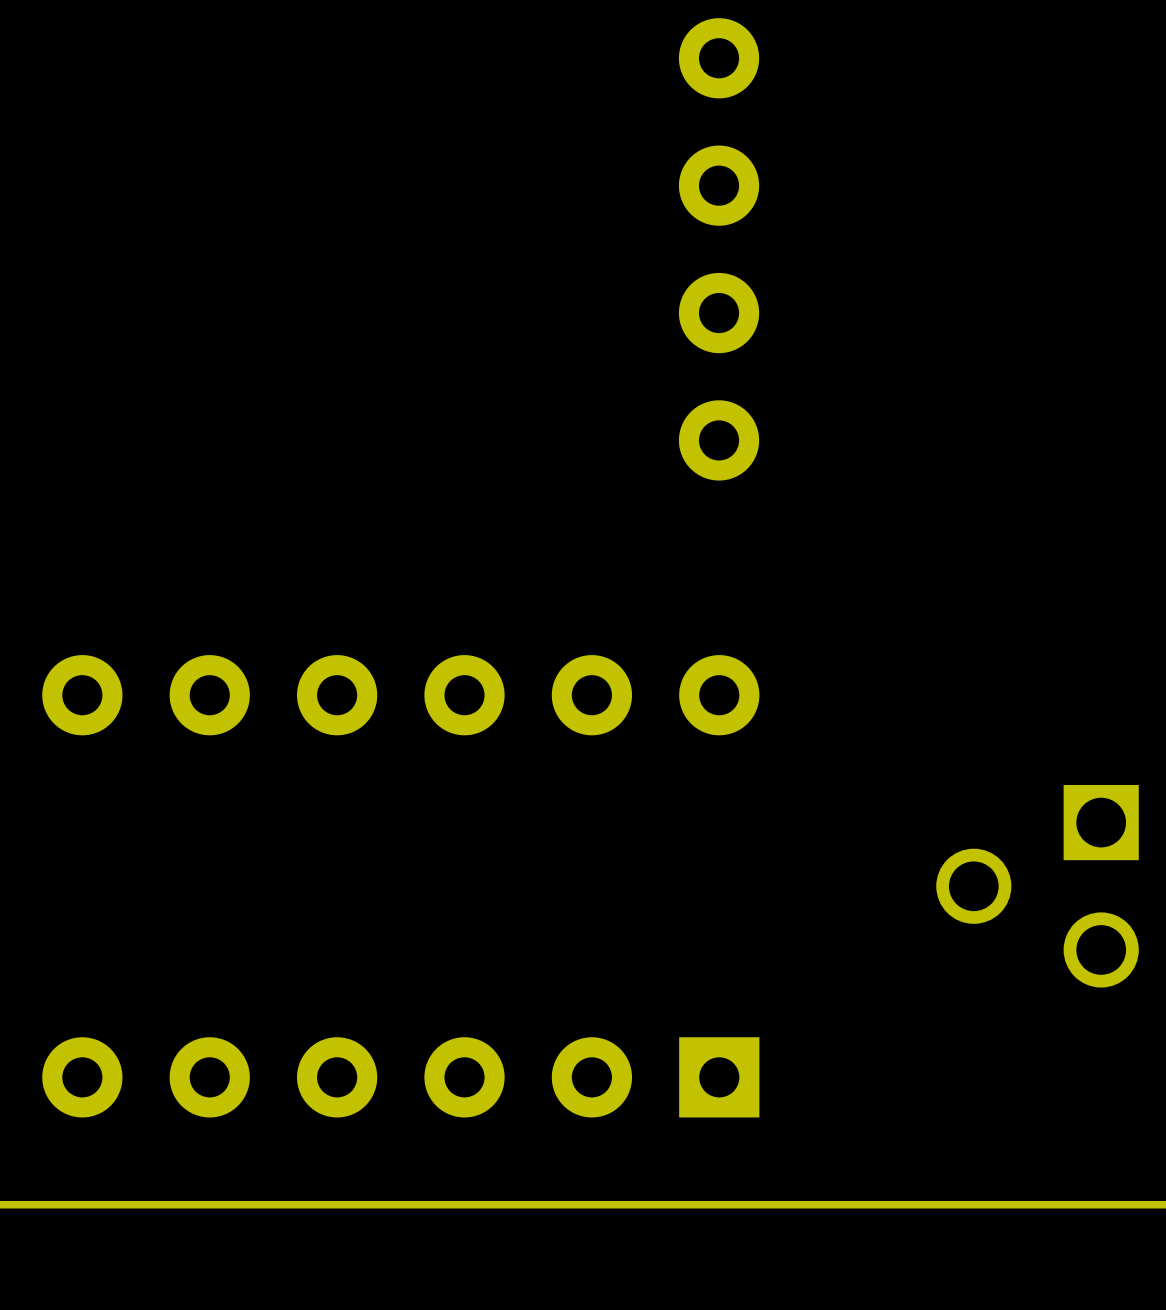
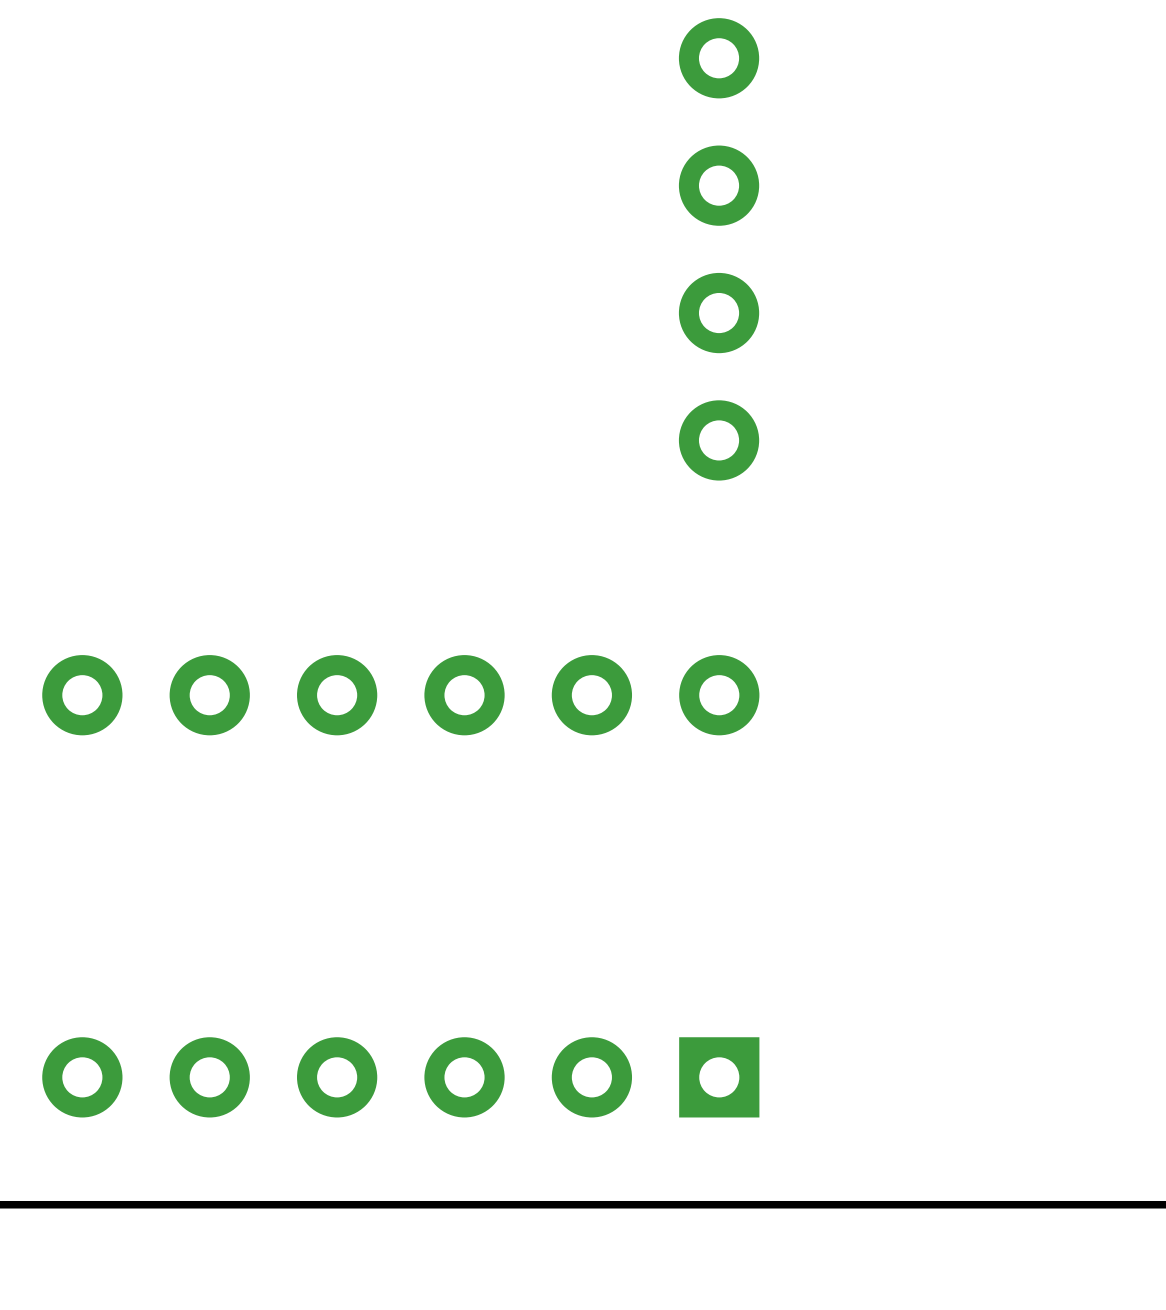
part: (1037, 886) -> none

